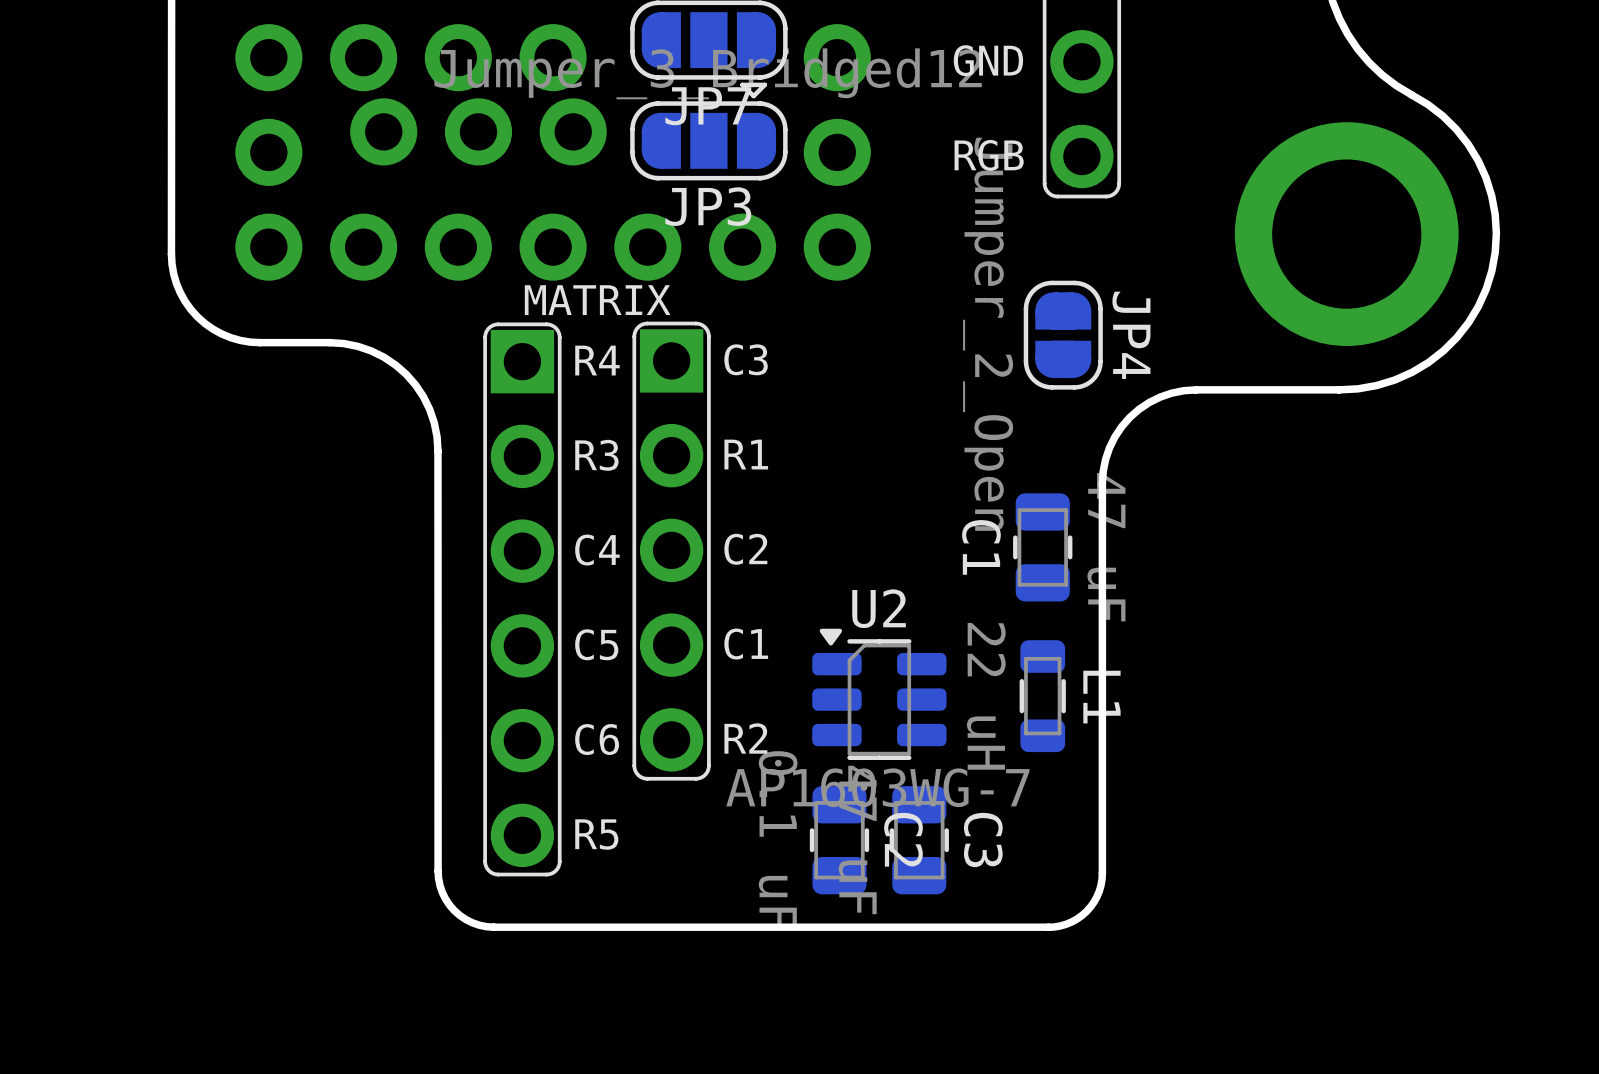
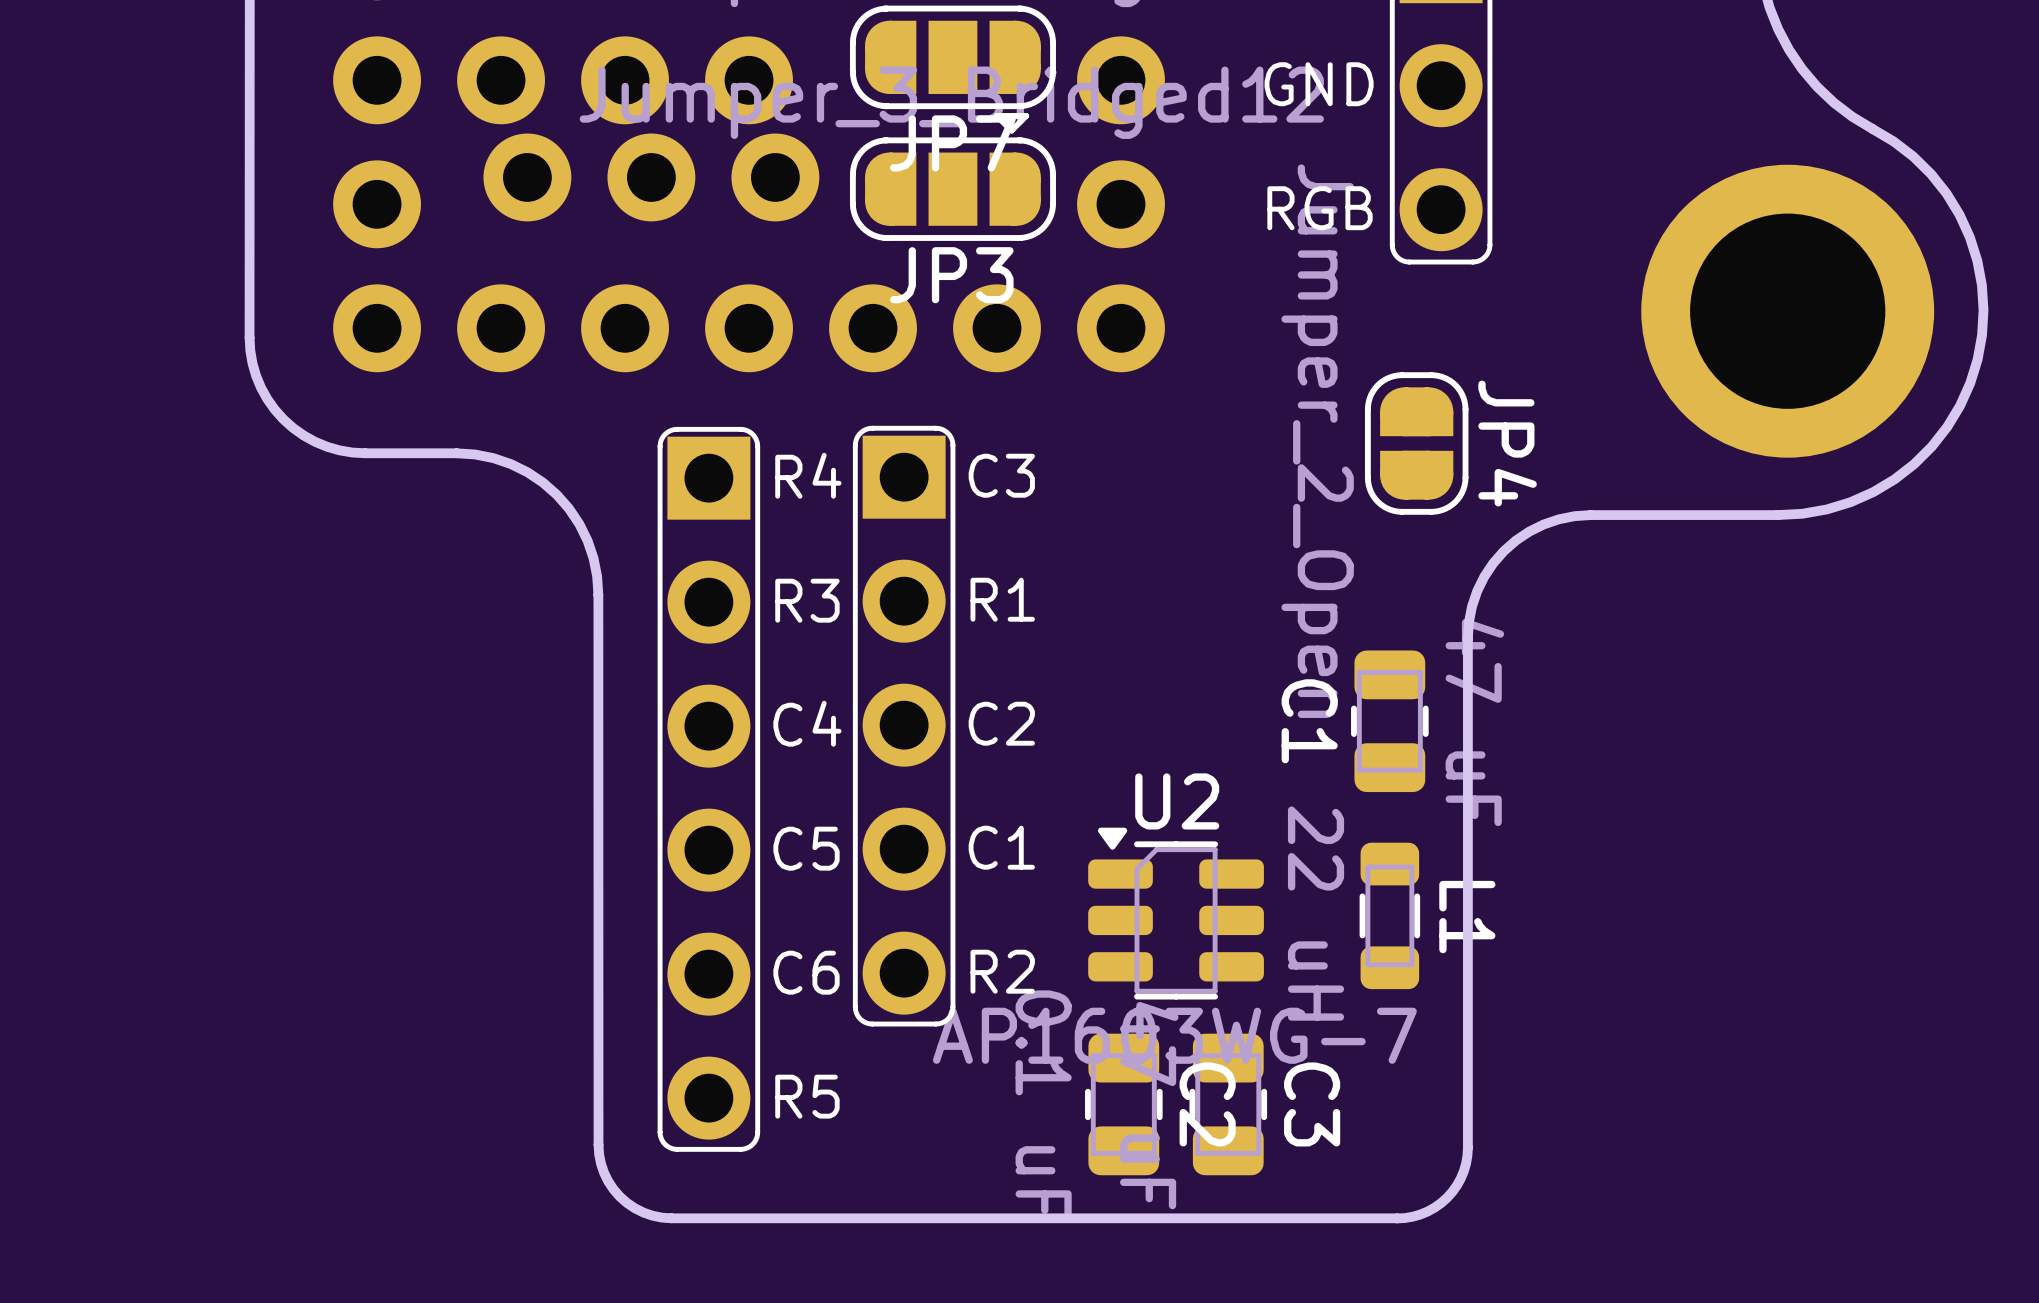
text: MATRIX (597, 300) -> none

